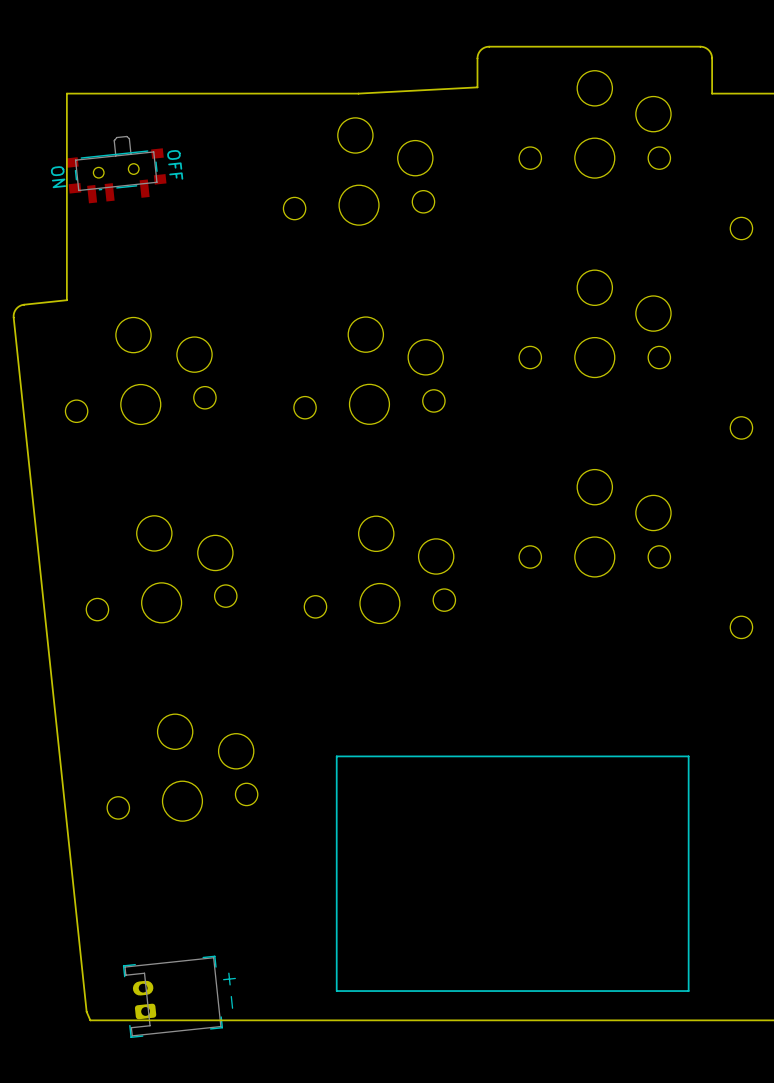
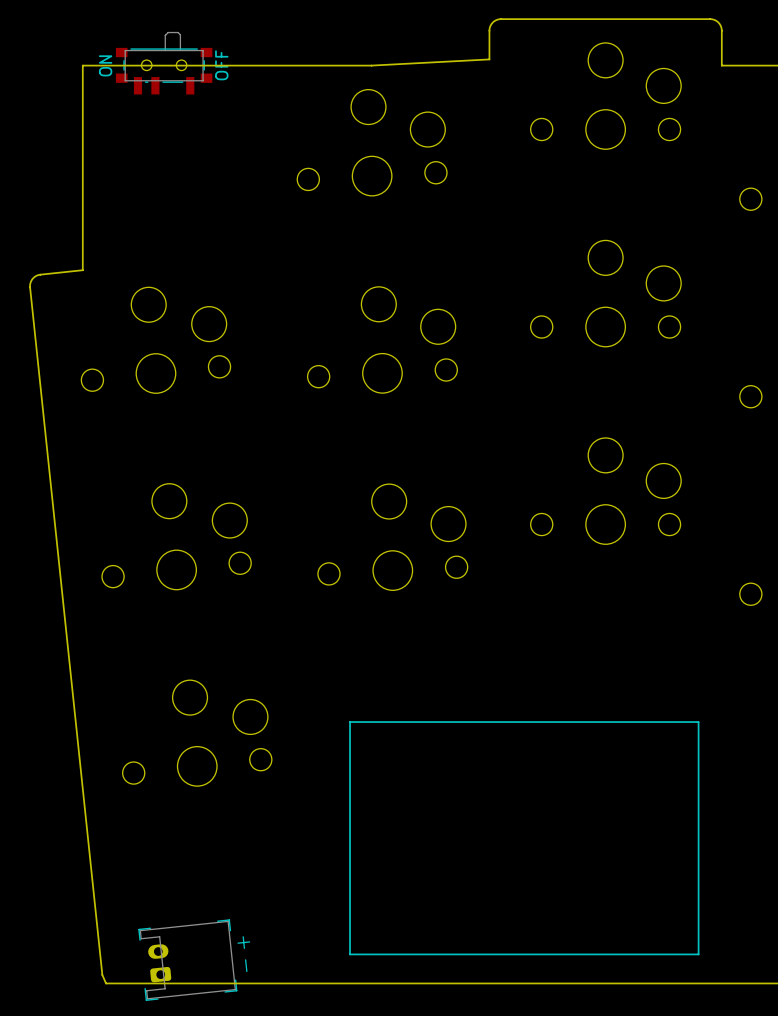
part: none -> (164, 63)
part: (116, 169) -> none

